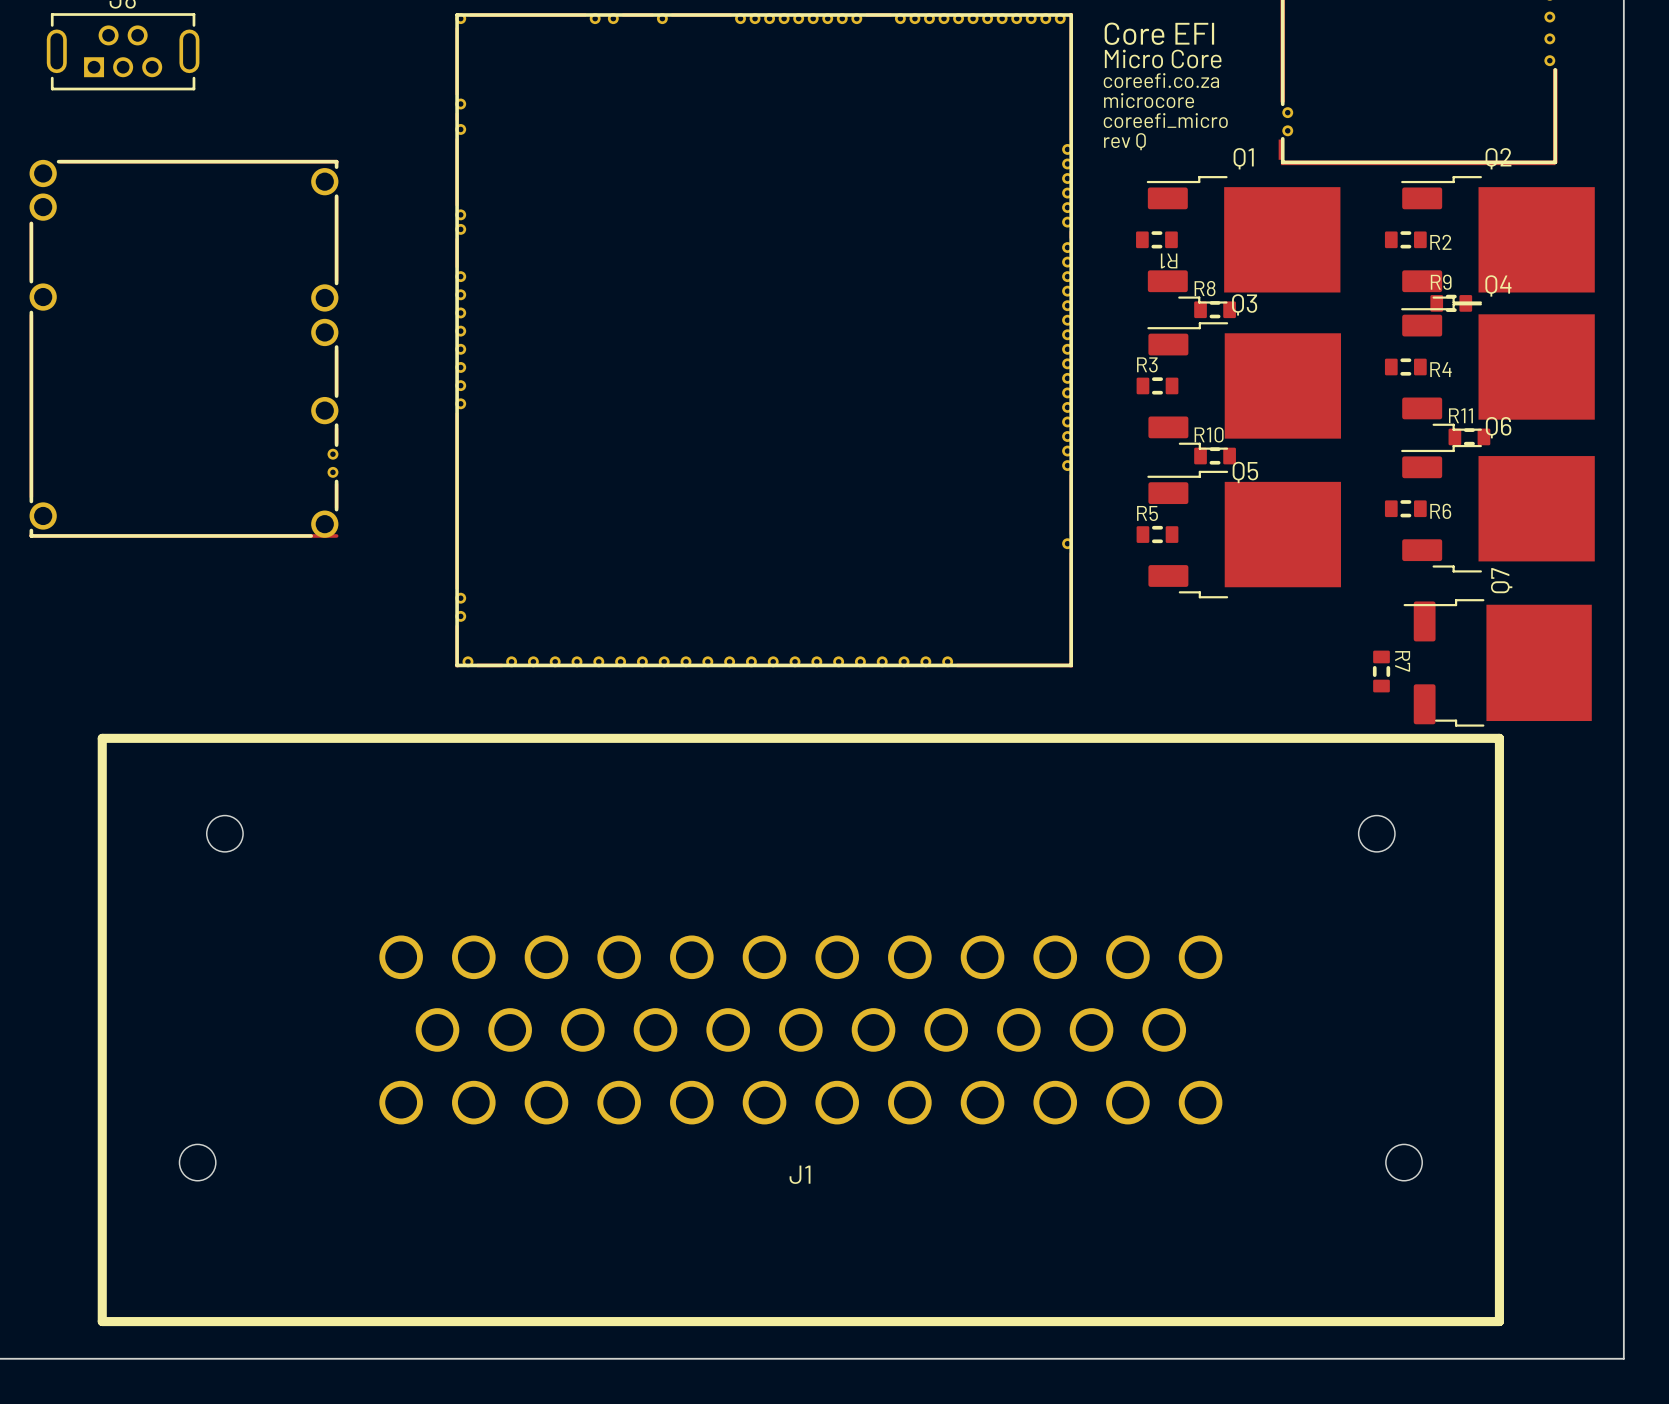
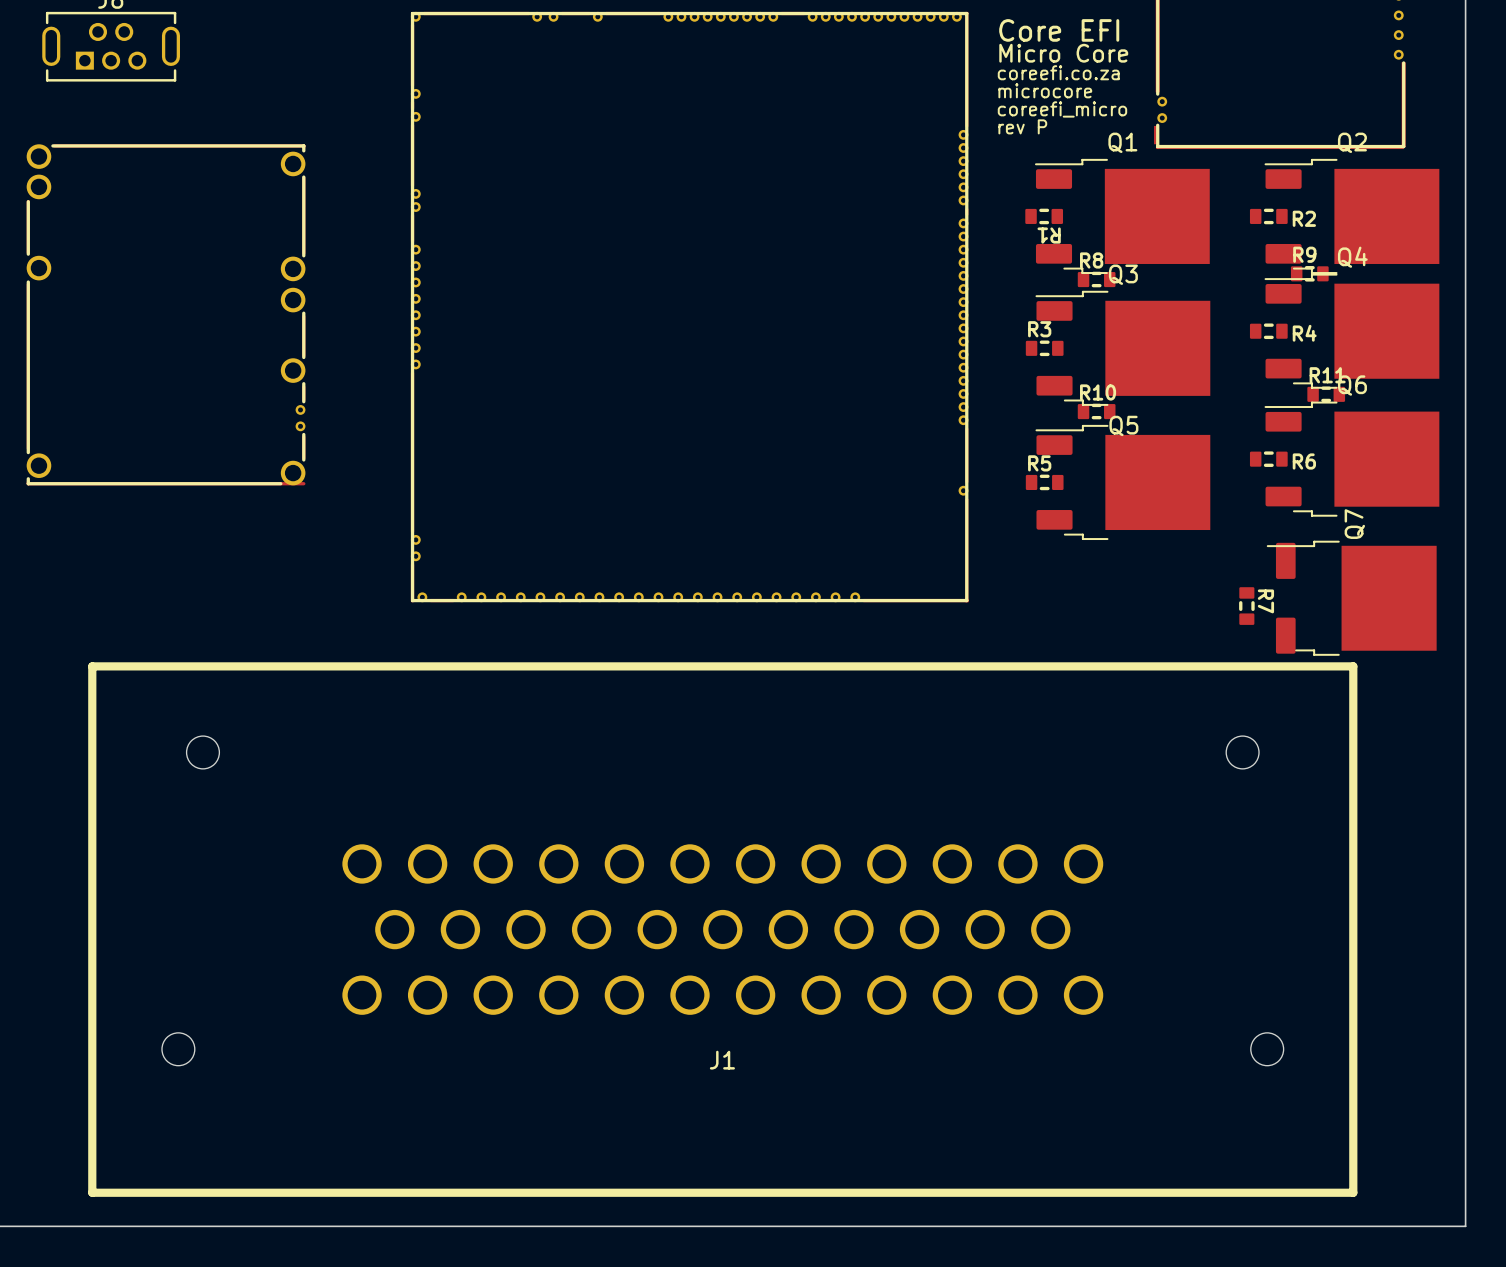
text: rev Q (1124, 141) -> rev P (1022, 126)

